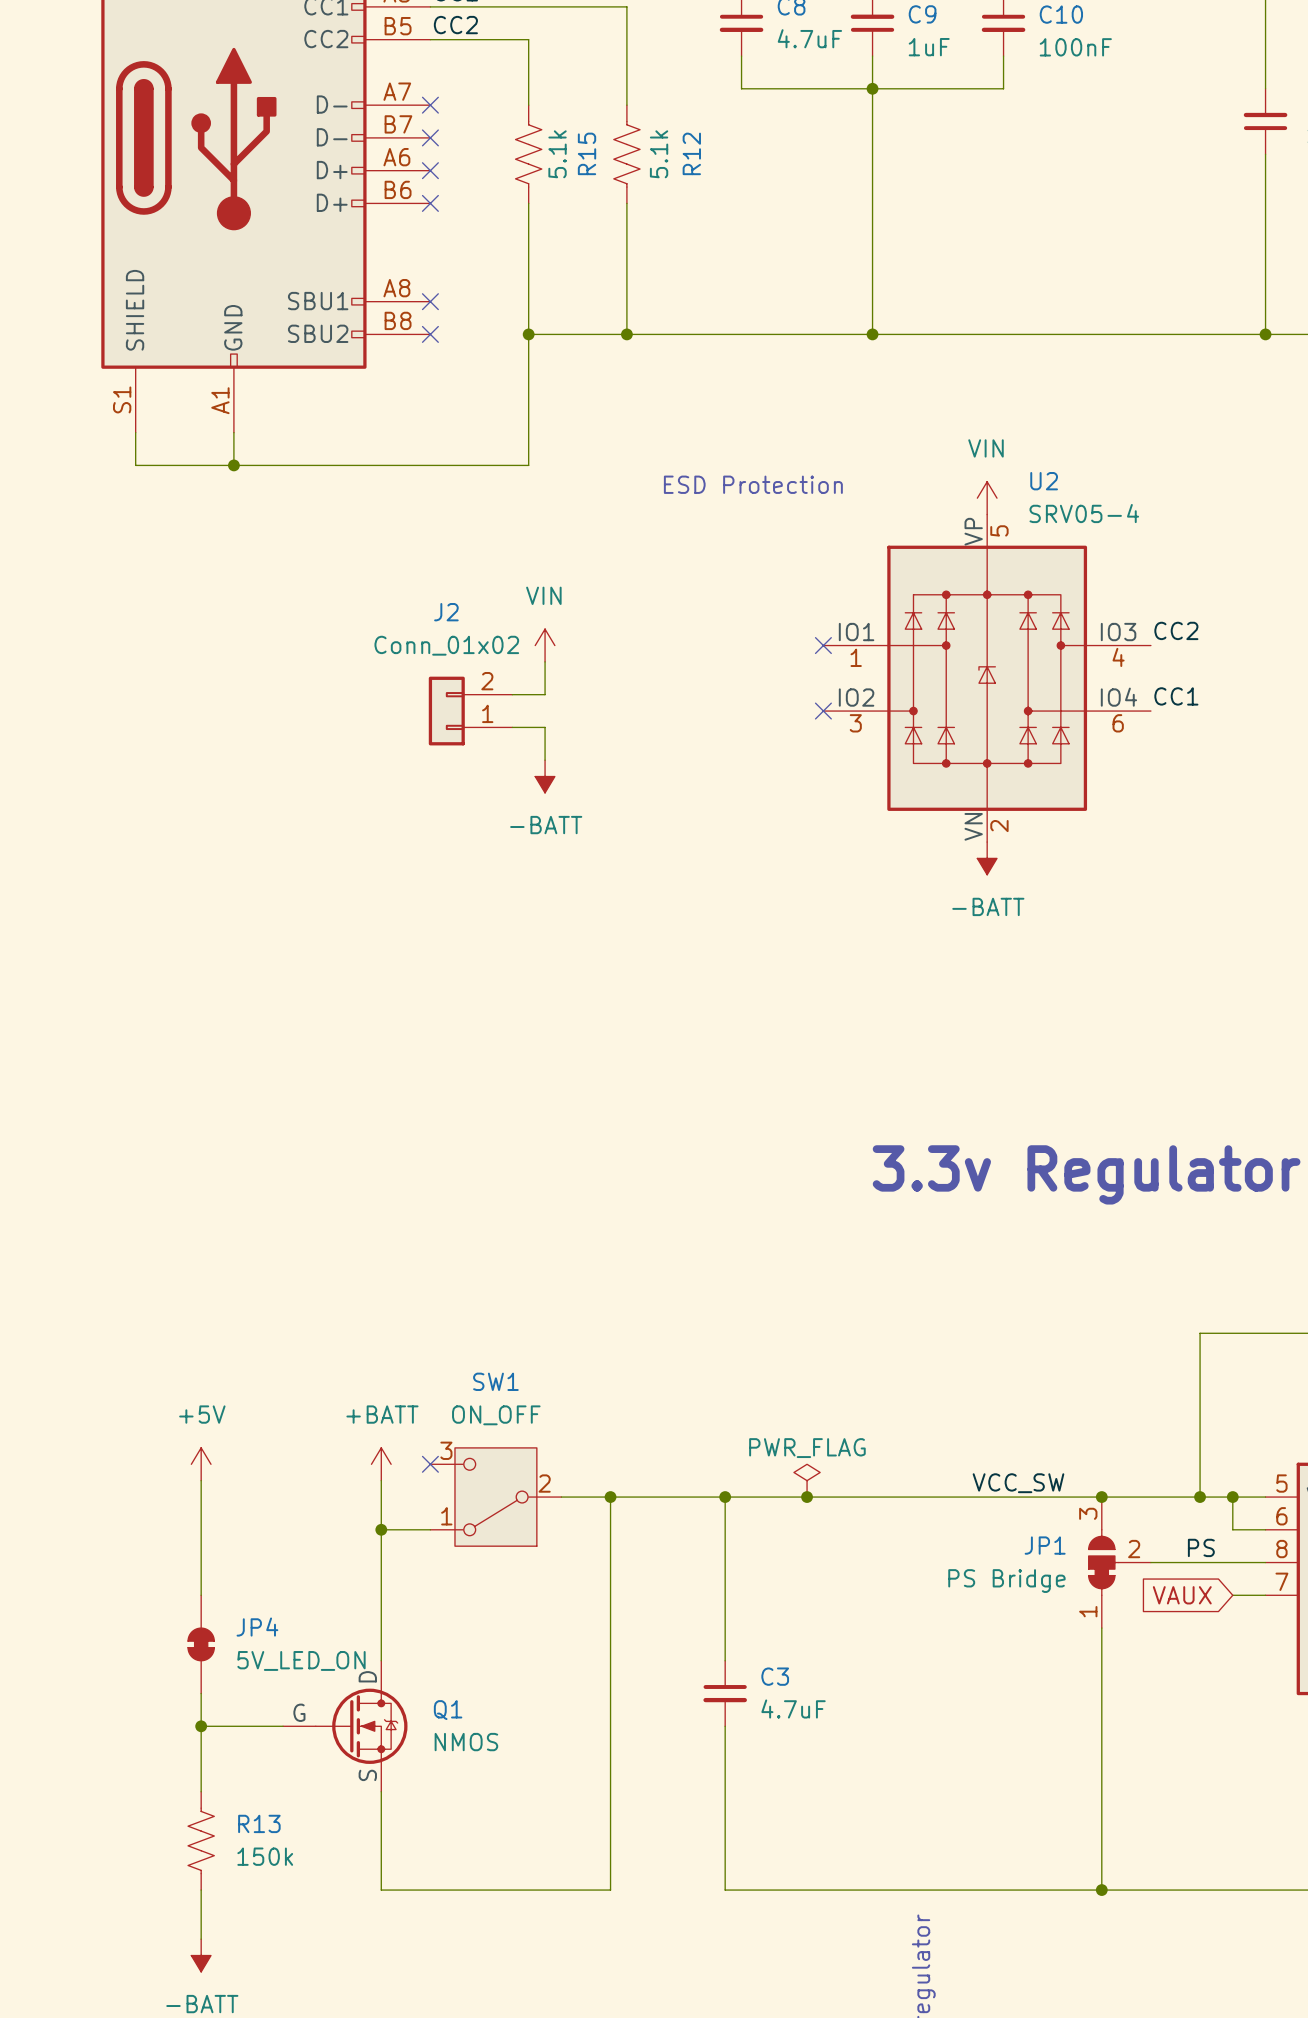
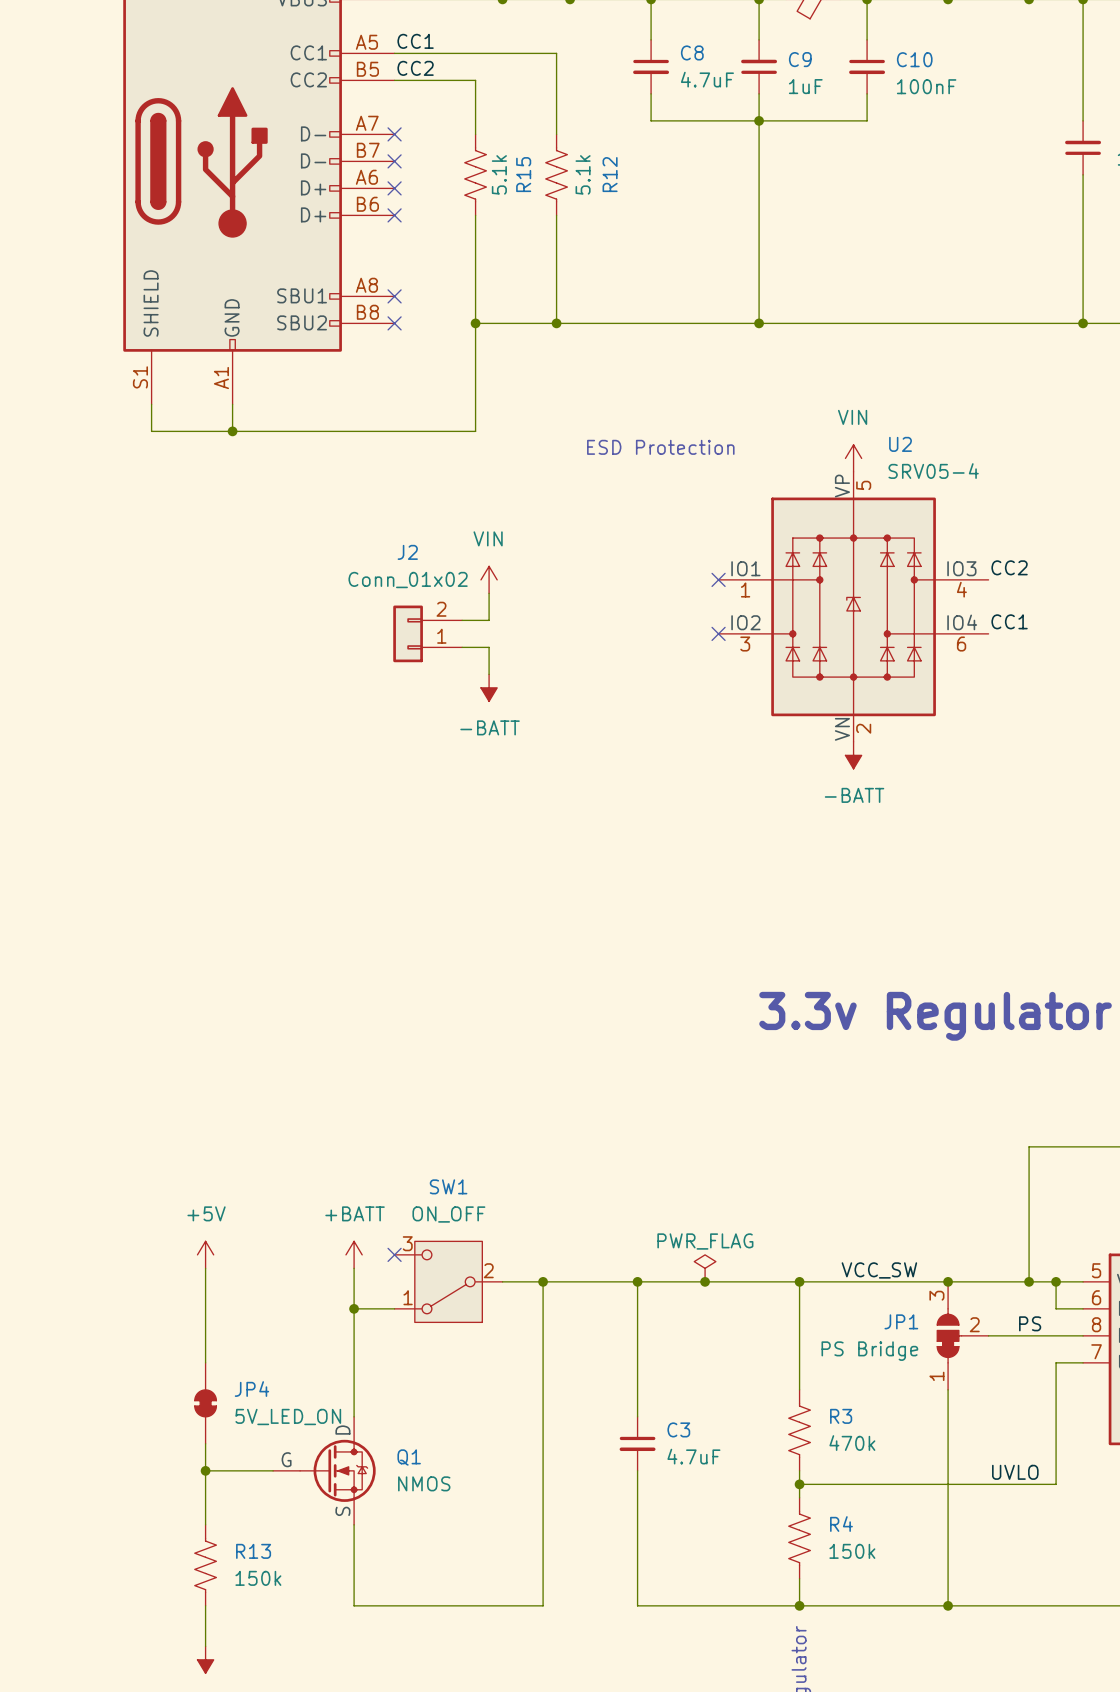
wire: none -> (799, 1281) (799, 1389)
junction: none -> (799, 1281)
global label: VAUX (1182, 1595) -> none
wire: none -> (1056, 1362) (1056, 1484) (799, 1484)
R3: none -> 470k (799, 1430)
wire: none -> (799, 1470) (799, 1497)
label: none -> UVLO (1015, 1472)
junction: none -> (799, 1484)
R4: none -> 150k (799, 1538)
wire: none -> (799, 1578) (799, 1605)
junction: none -> (799, 1605)

